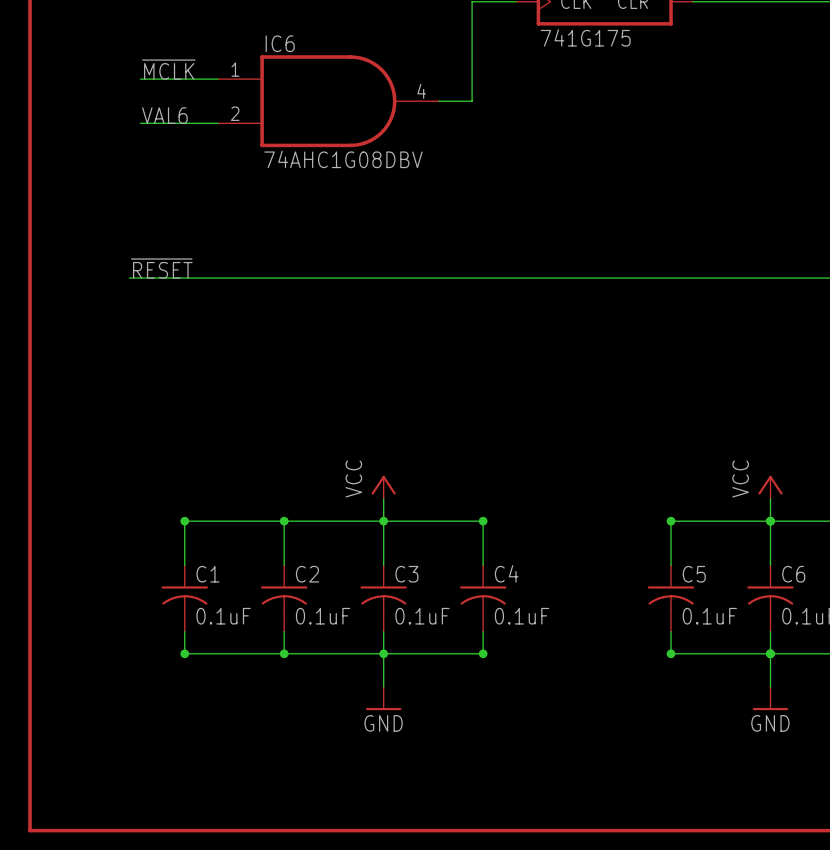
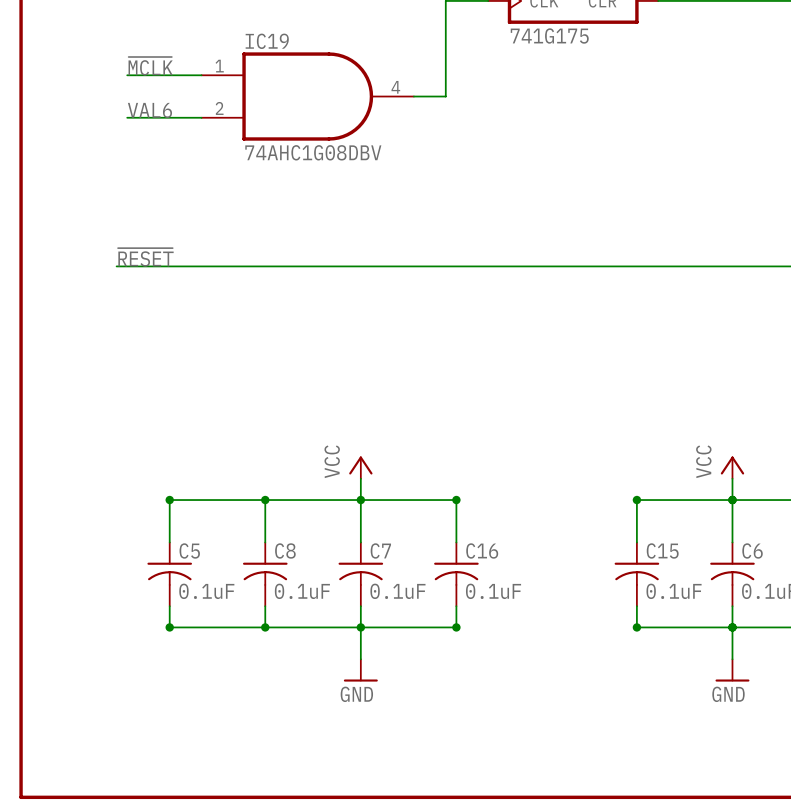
IC6 name: IC6 (280, 43) -> IC19 (267, 41)
C4 name: C4 (506, 573) -> C16 (482, 550)
C1 name: C1 (207, 574) -> C5 (189, 550)
C2 name: C2 (307, 574) -> C8 (285, 550)
C3 name: C3 (406, 574) -> C7 (380, 550)
C5 name: C5 (694, 574) -> C15 (662, 550)

